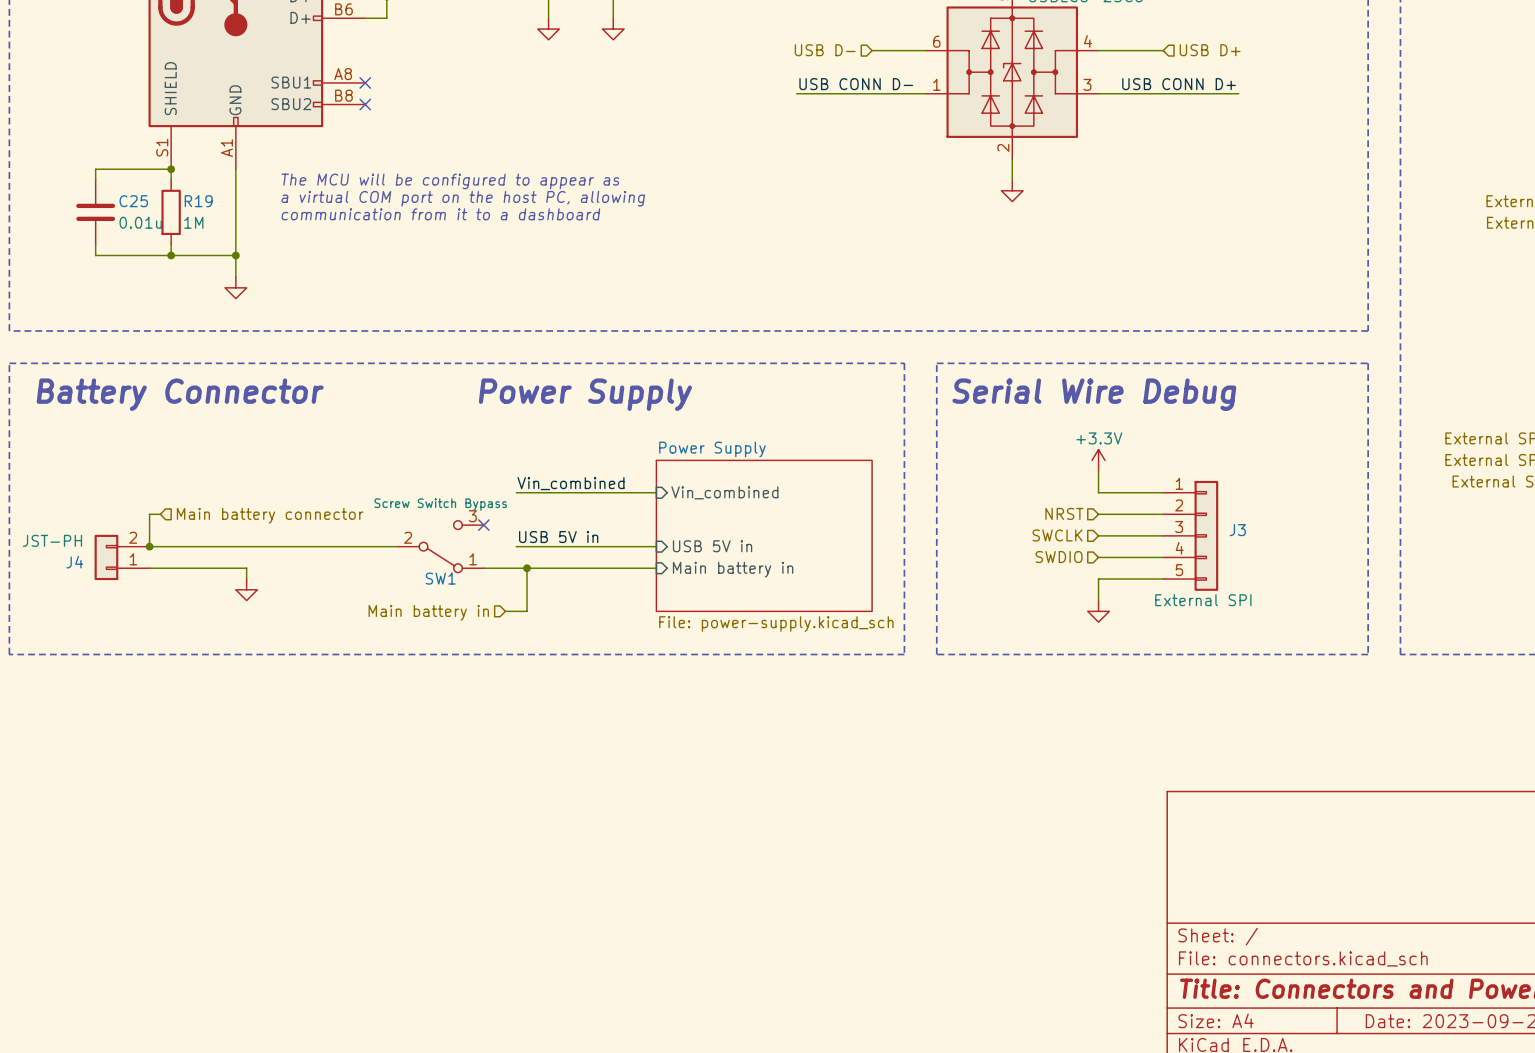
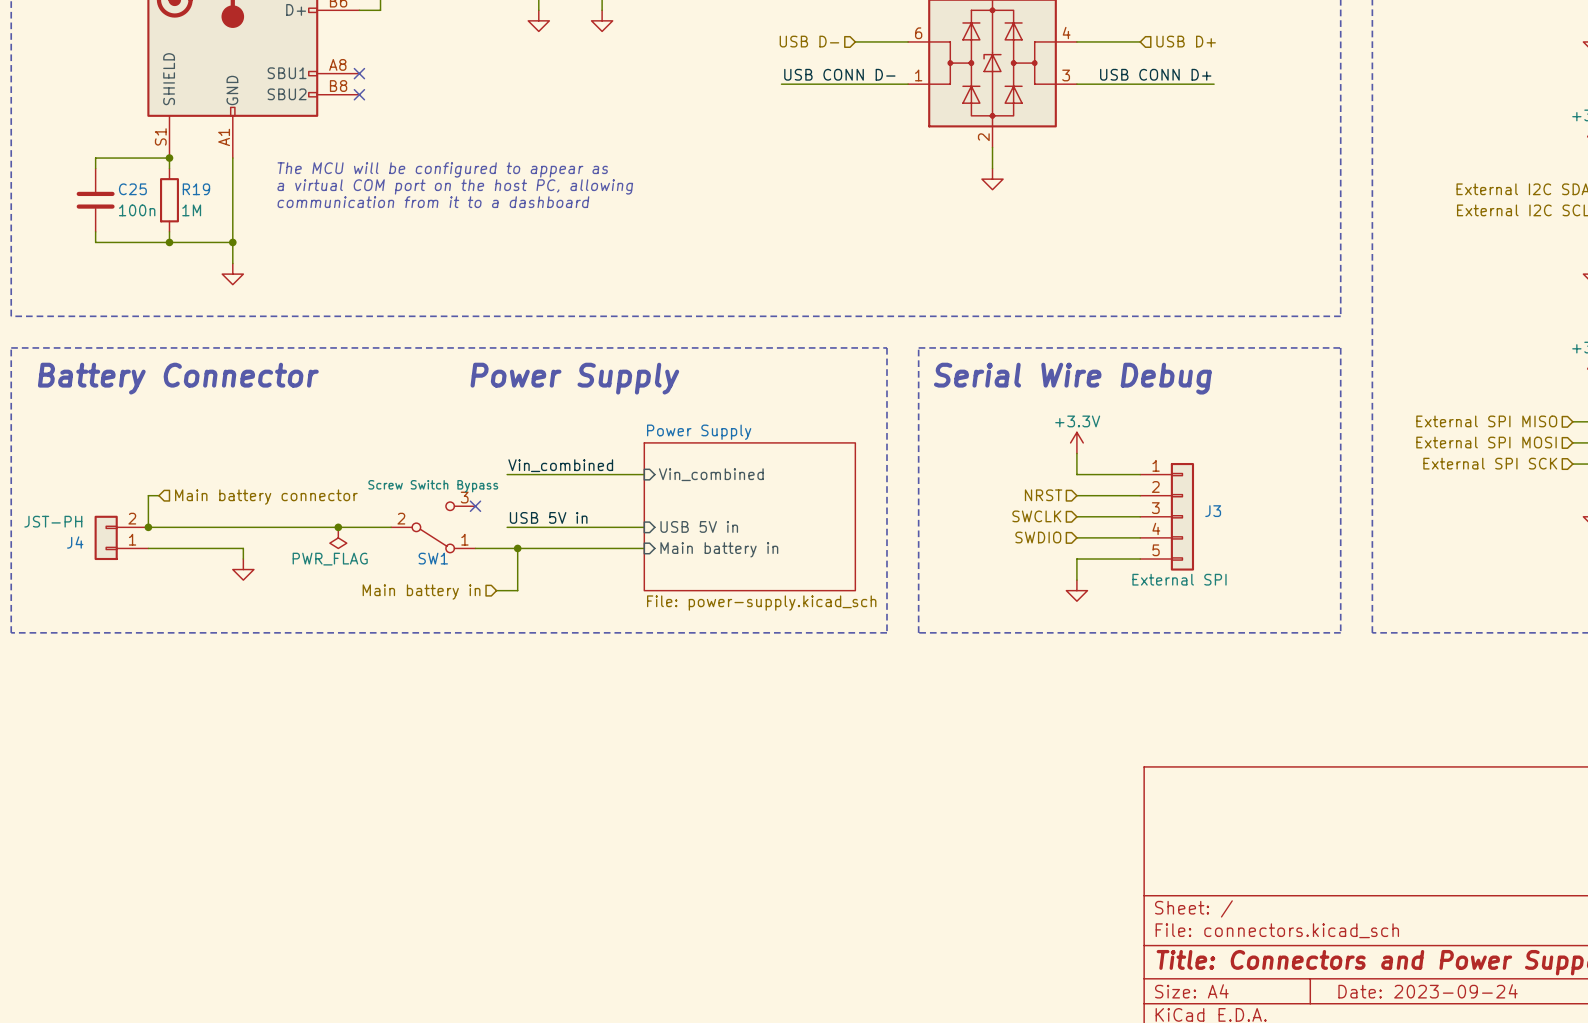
C25 value: 0.01u (140, 222) -> 100n (137, 210)
junction: none -> (338, 527)
power symbol: none -> PWR_FLAG (338, 537)

